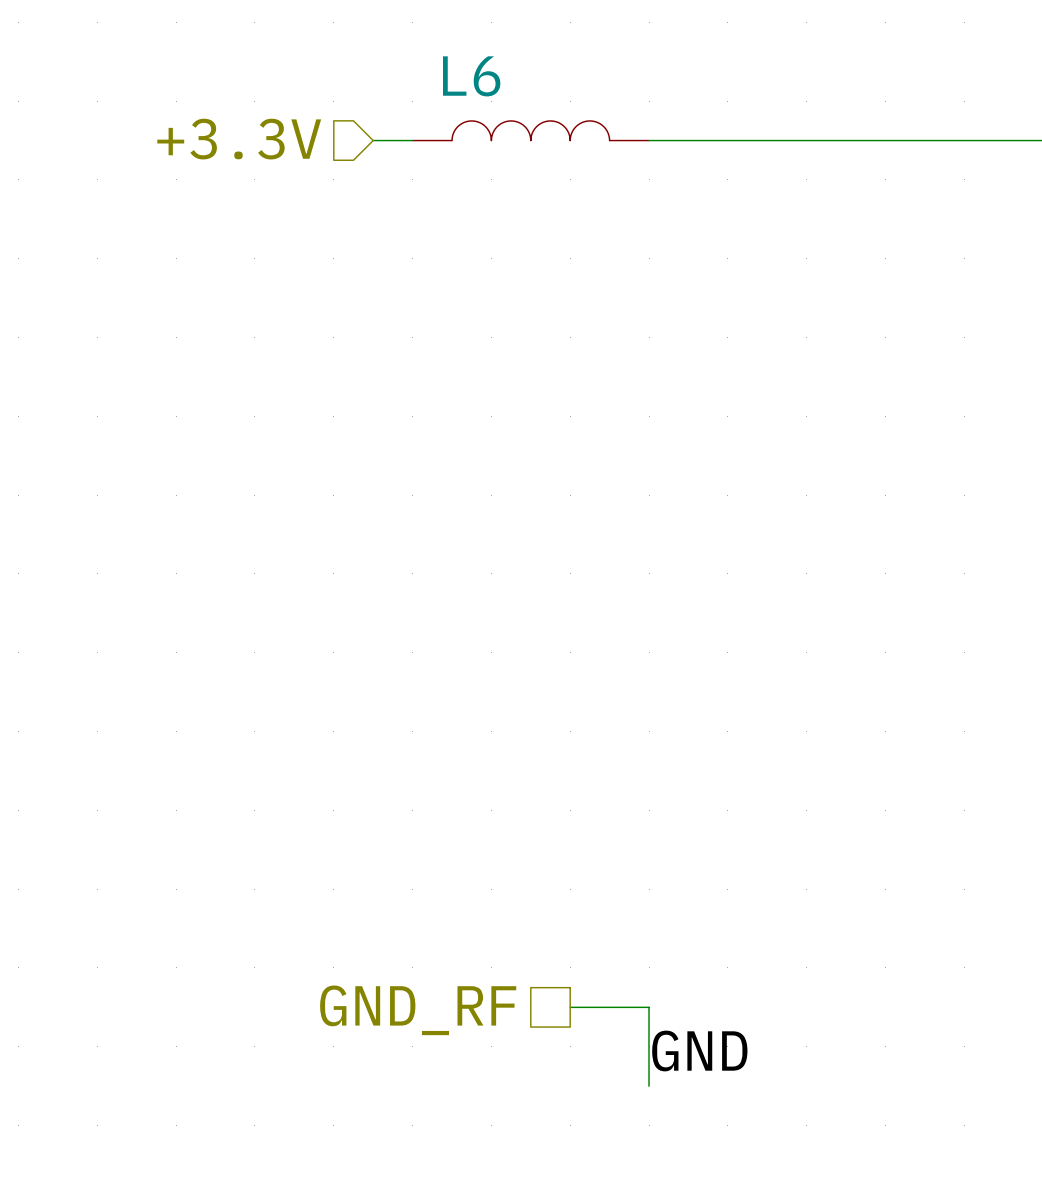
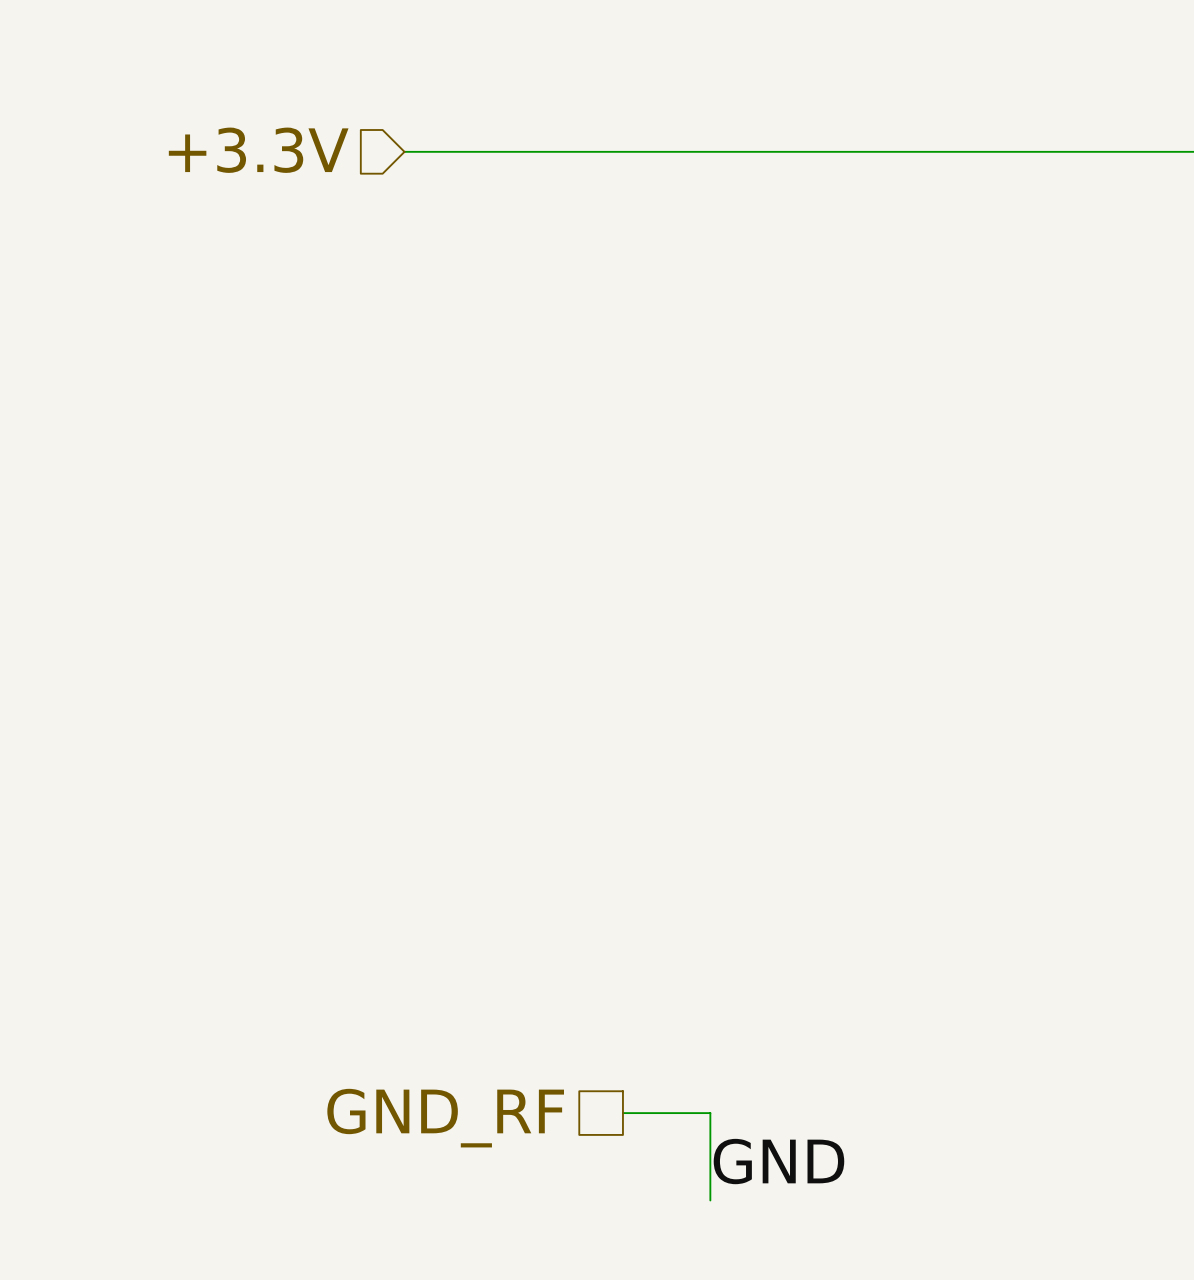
L6: (530, 130) -> none
wire: none -> (448, 151) (710, 151)

